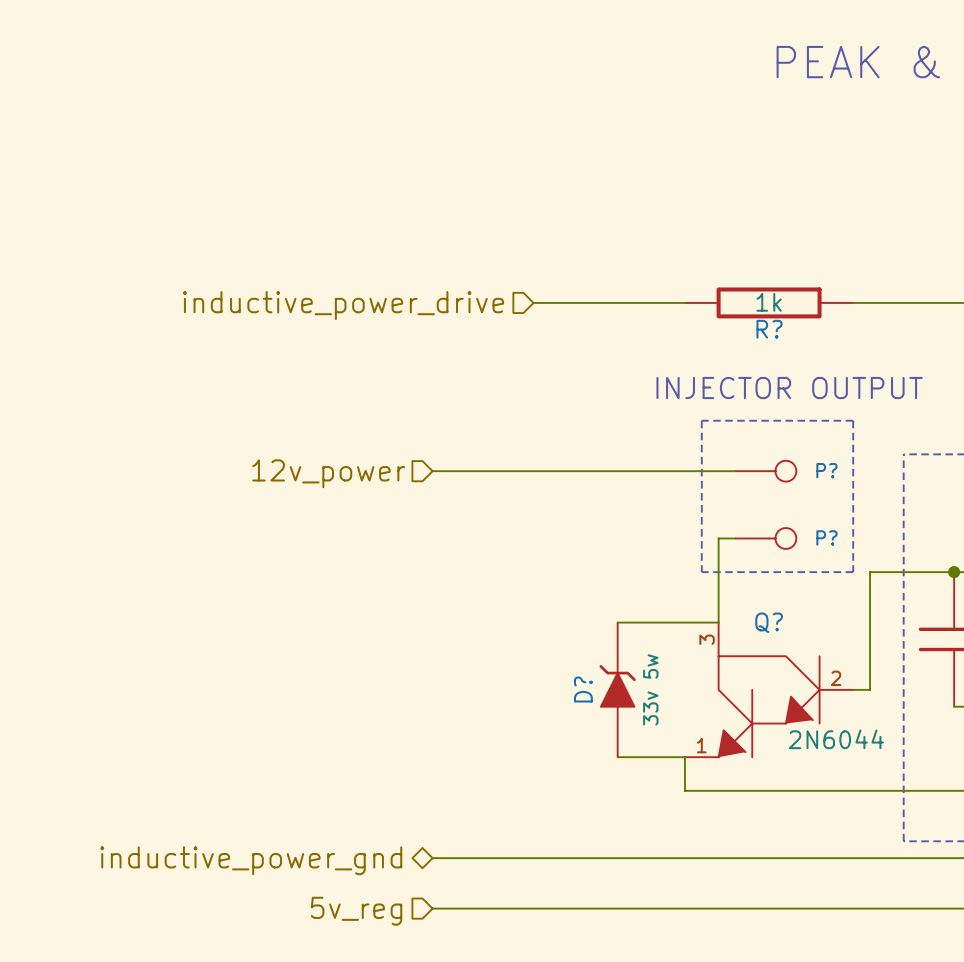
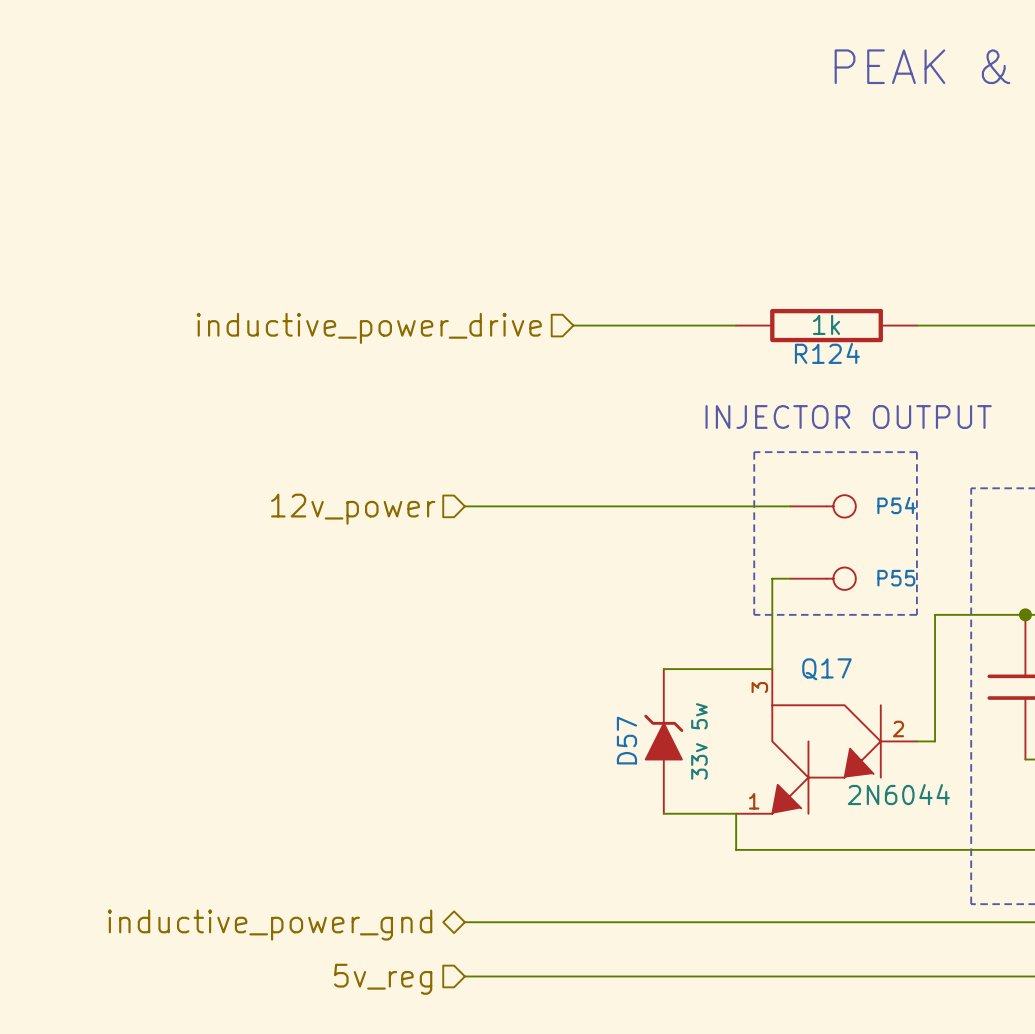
R? name: R? (769, 329) -> R124 (827, 353)
P? name: P? (826, 470) -> P54 (896, 505)
P? name: P? (826, 537) -> P55 (896, 578)
Q? name: Q? (769, 622) -> Q17 (826, 669)
D? name: D? (583, 689) -> D57 (626, 740)

